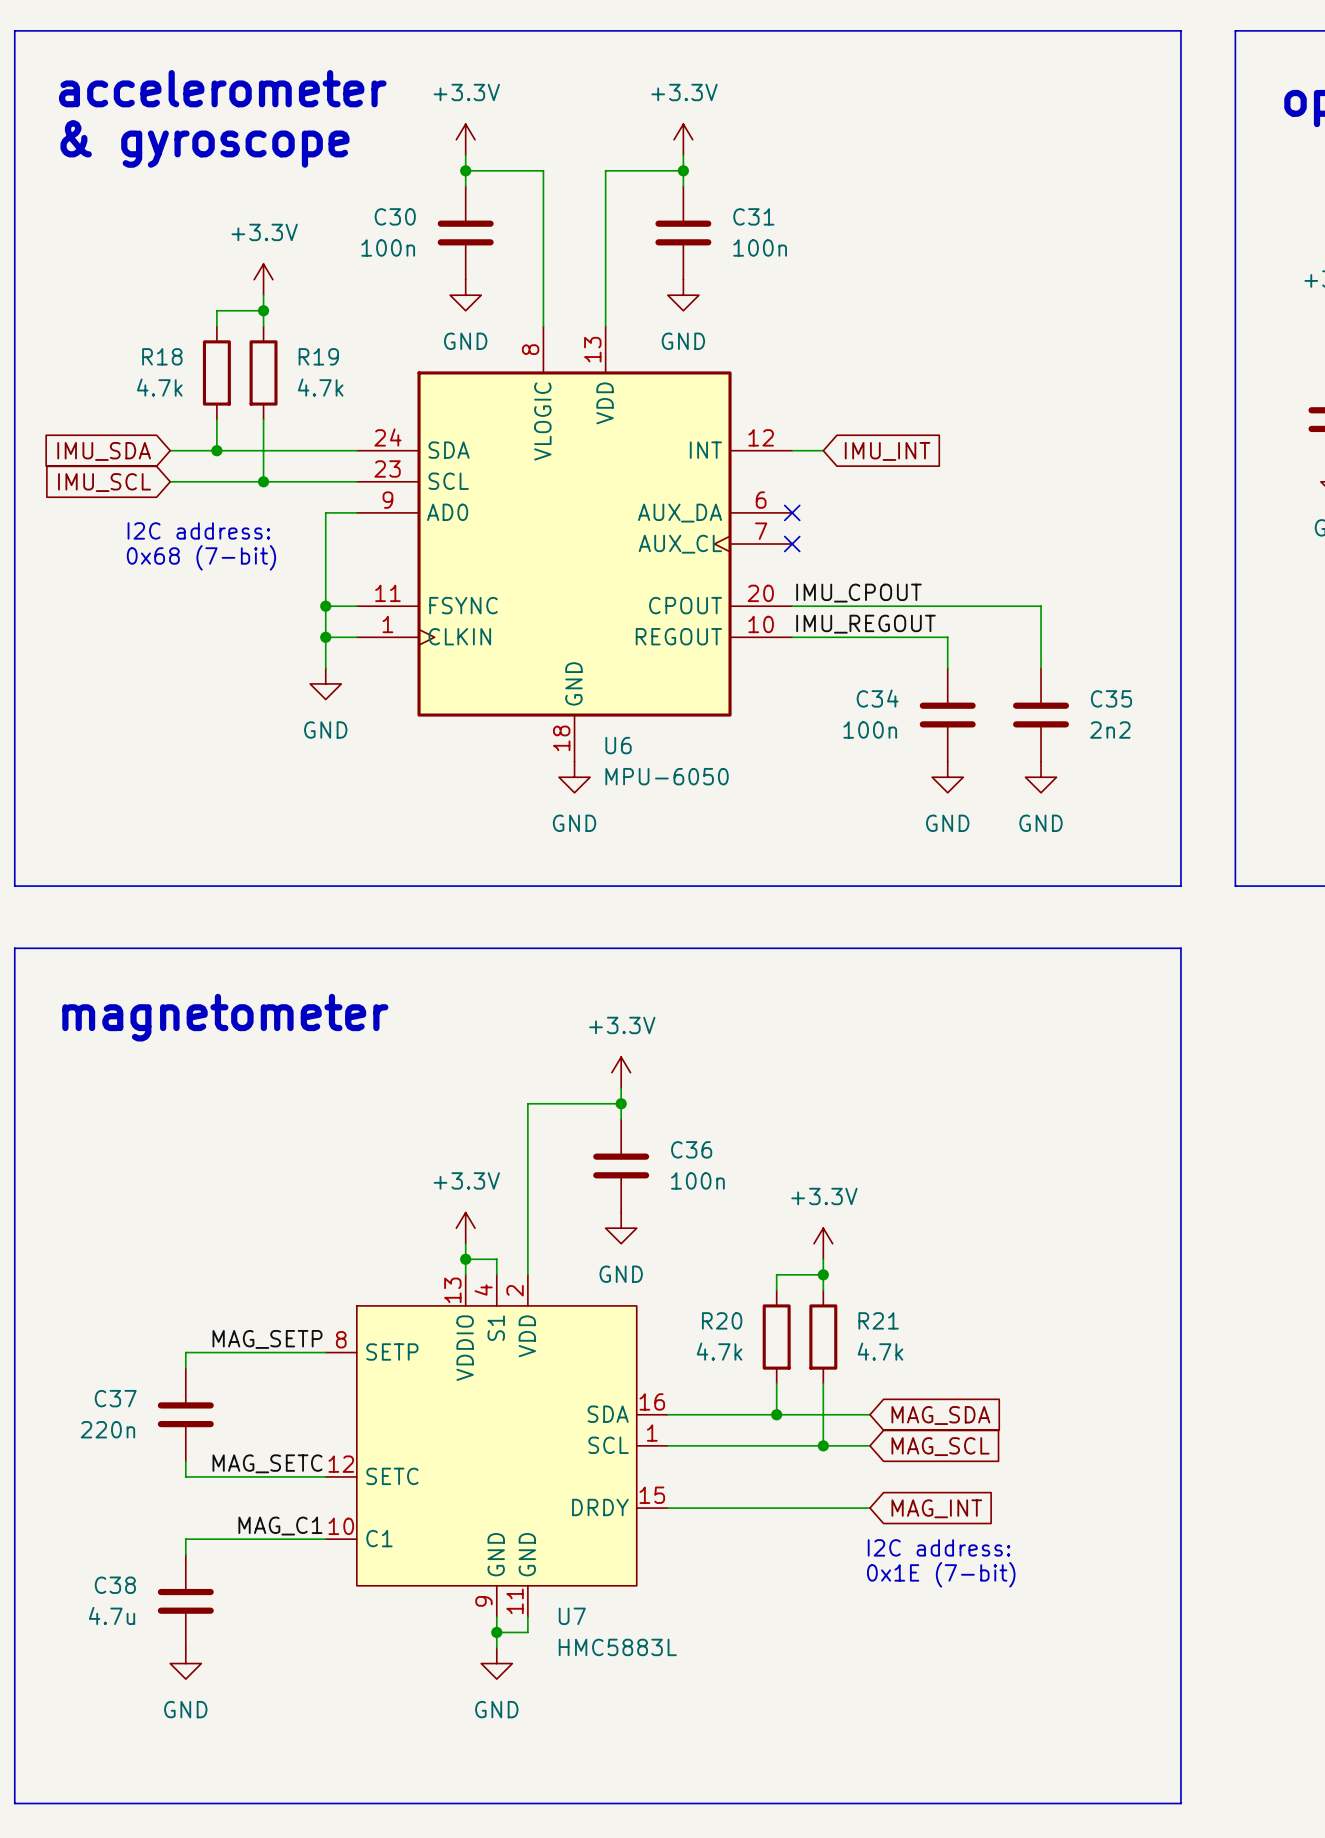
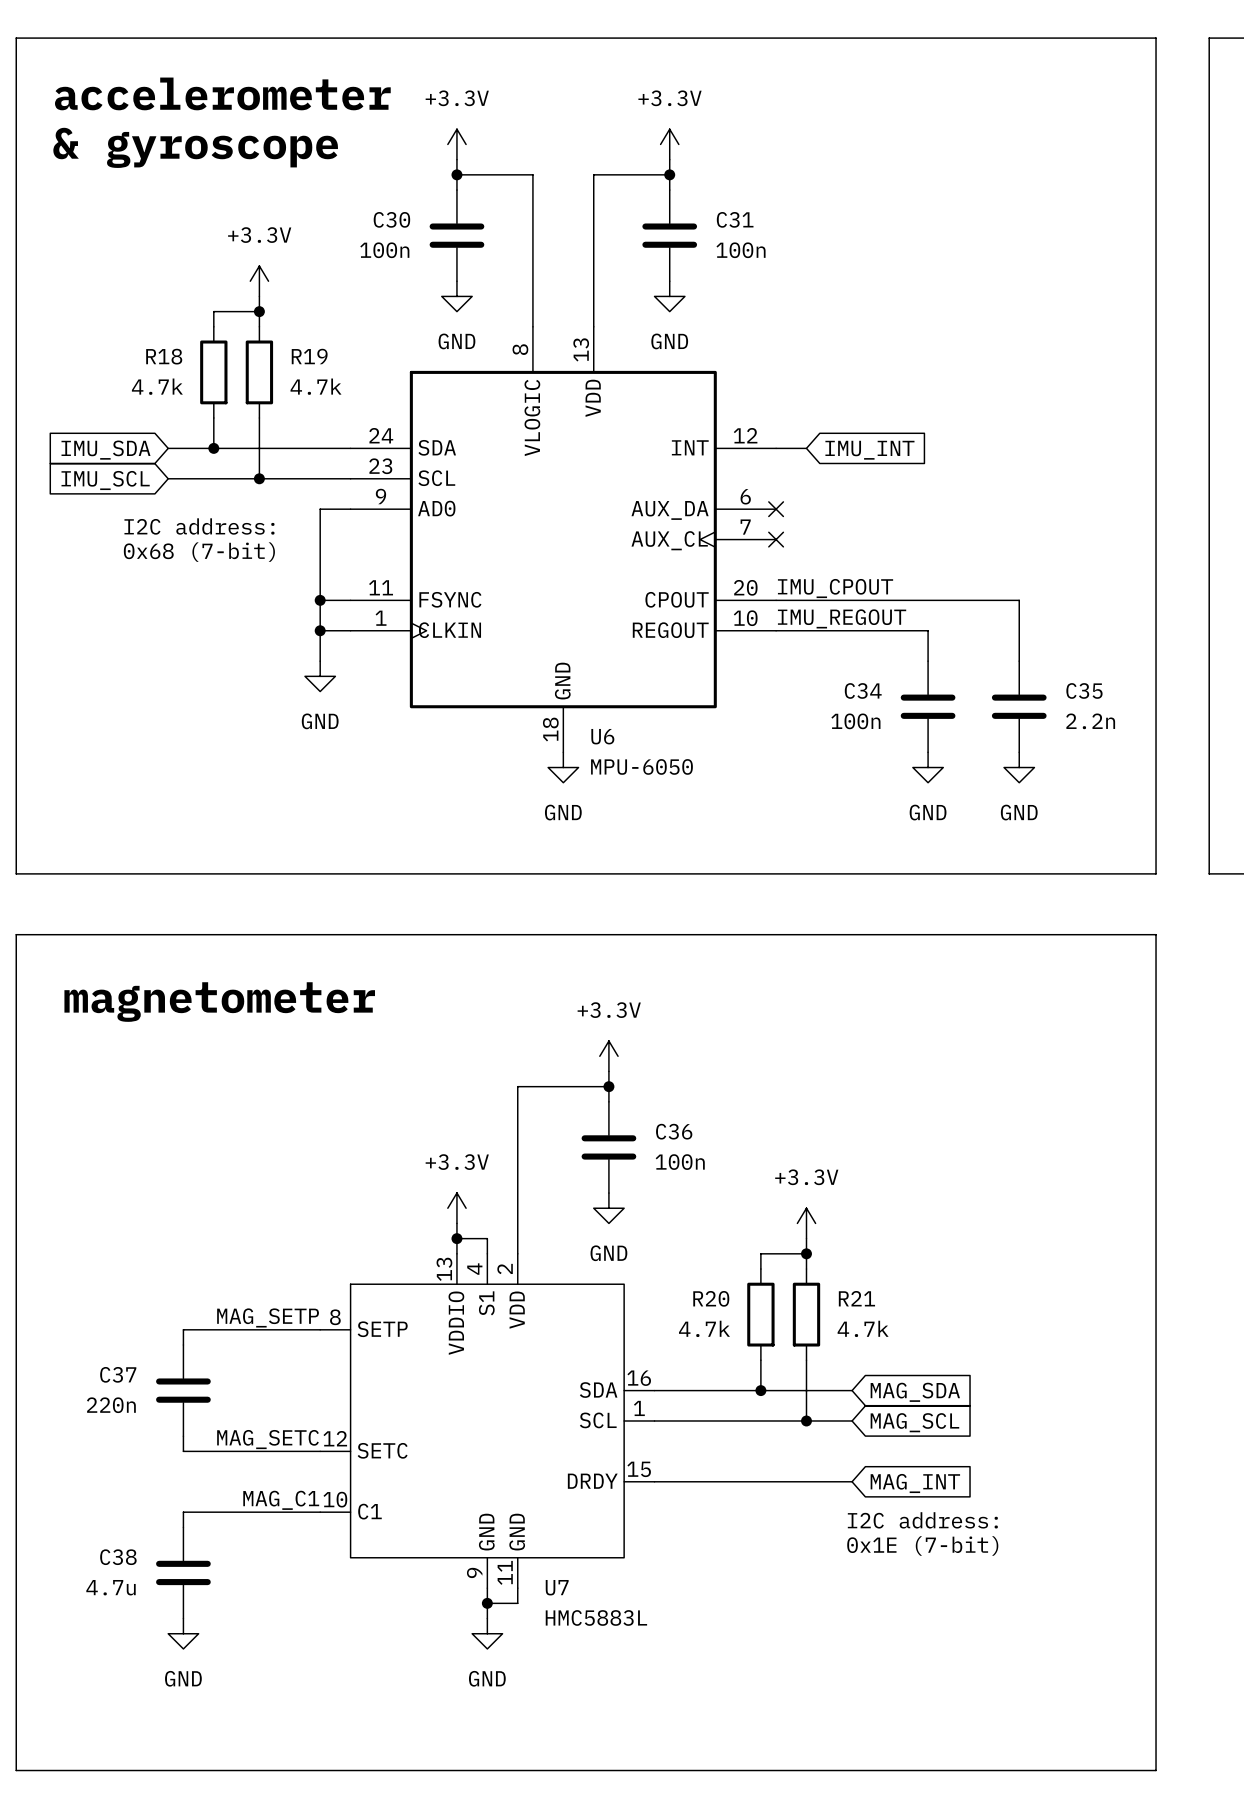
C35 value: 2n2 (1110, 730) -> 2.2n (1090, 721)

